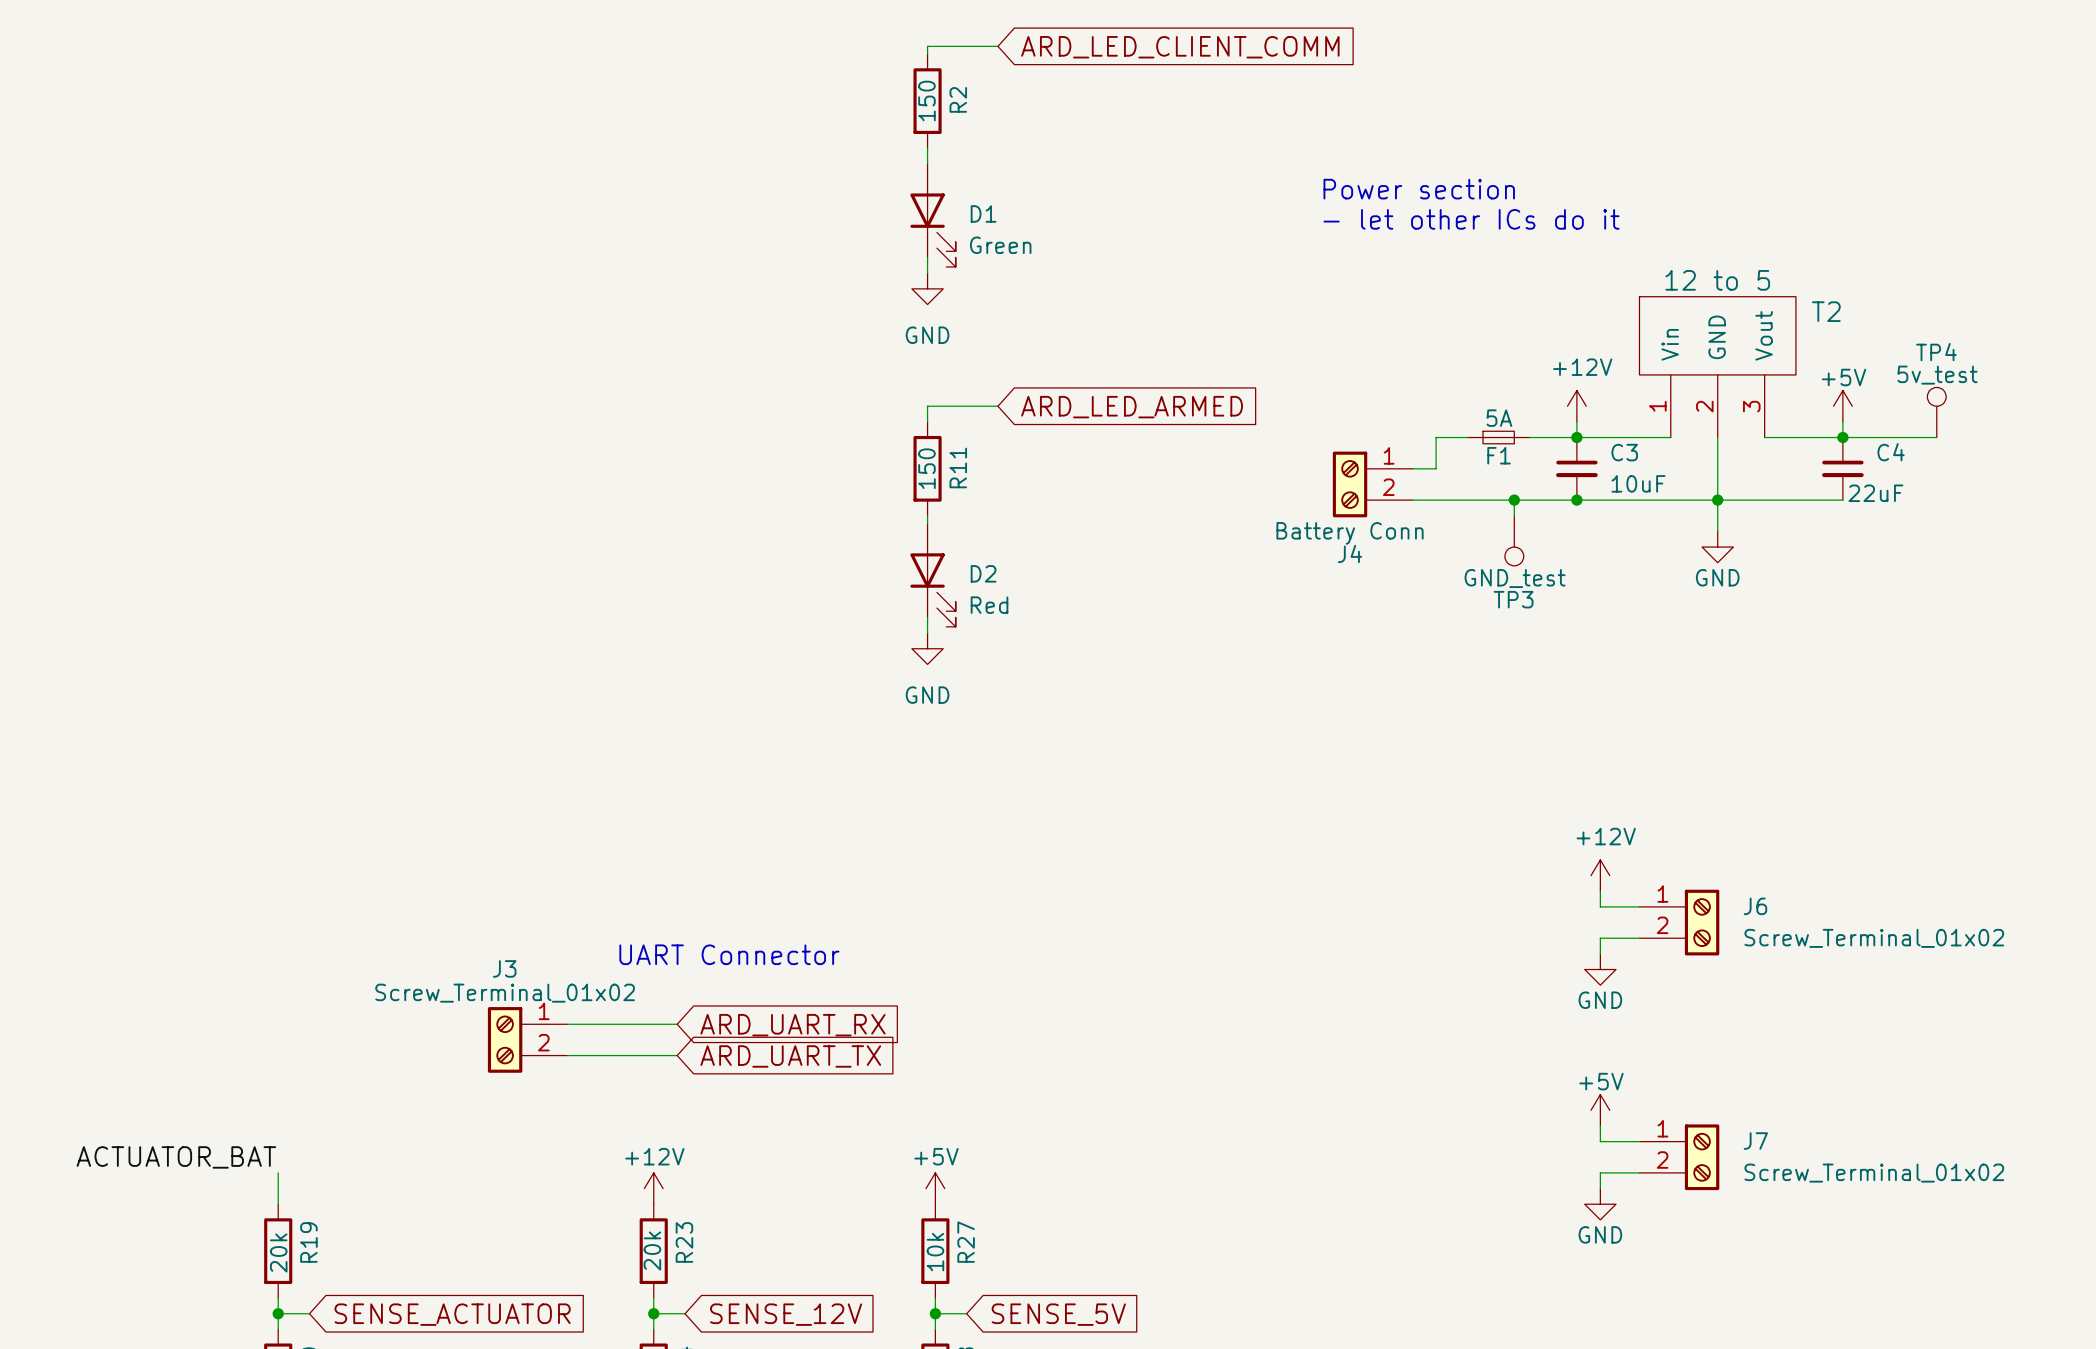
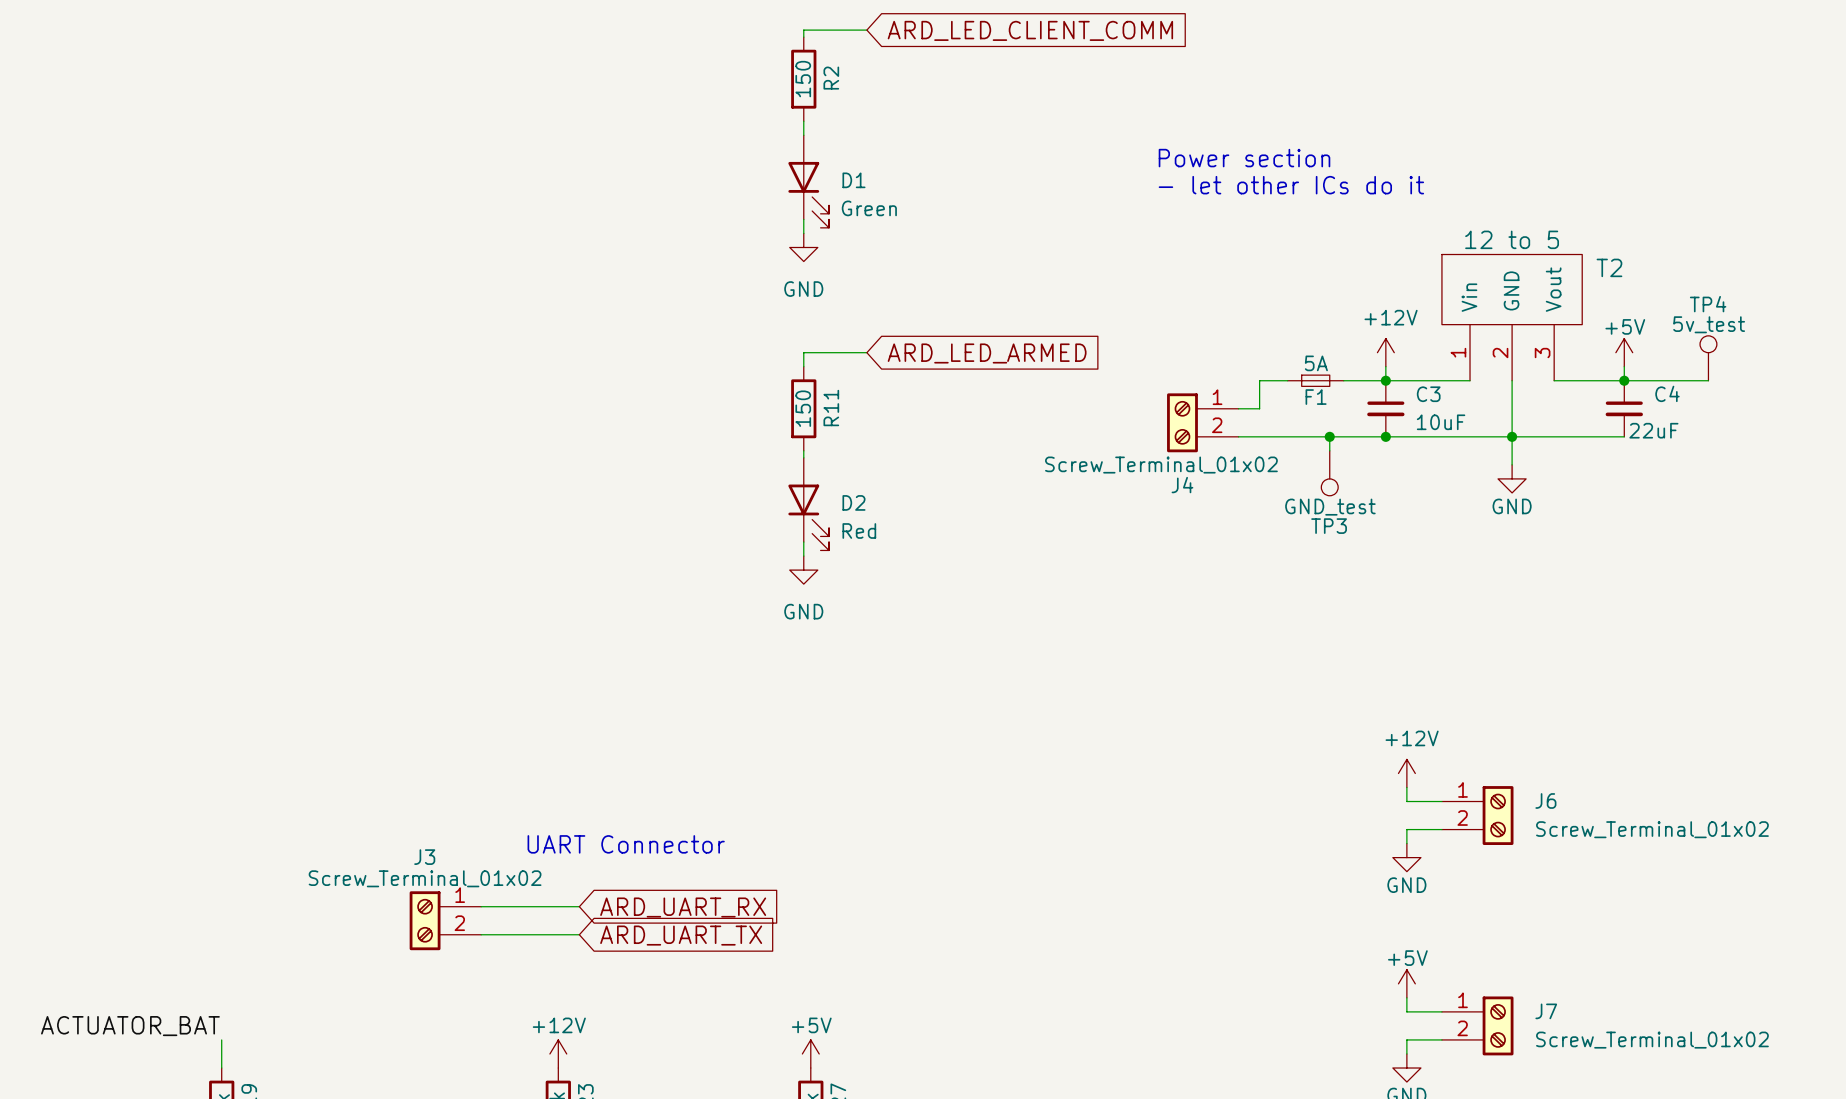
J4 value: Battery Conn (1350, 533) -> Screw_Terminal_01x02 (1161, 465)

